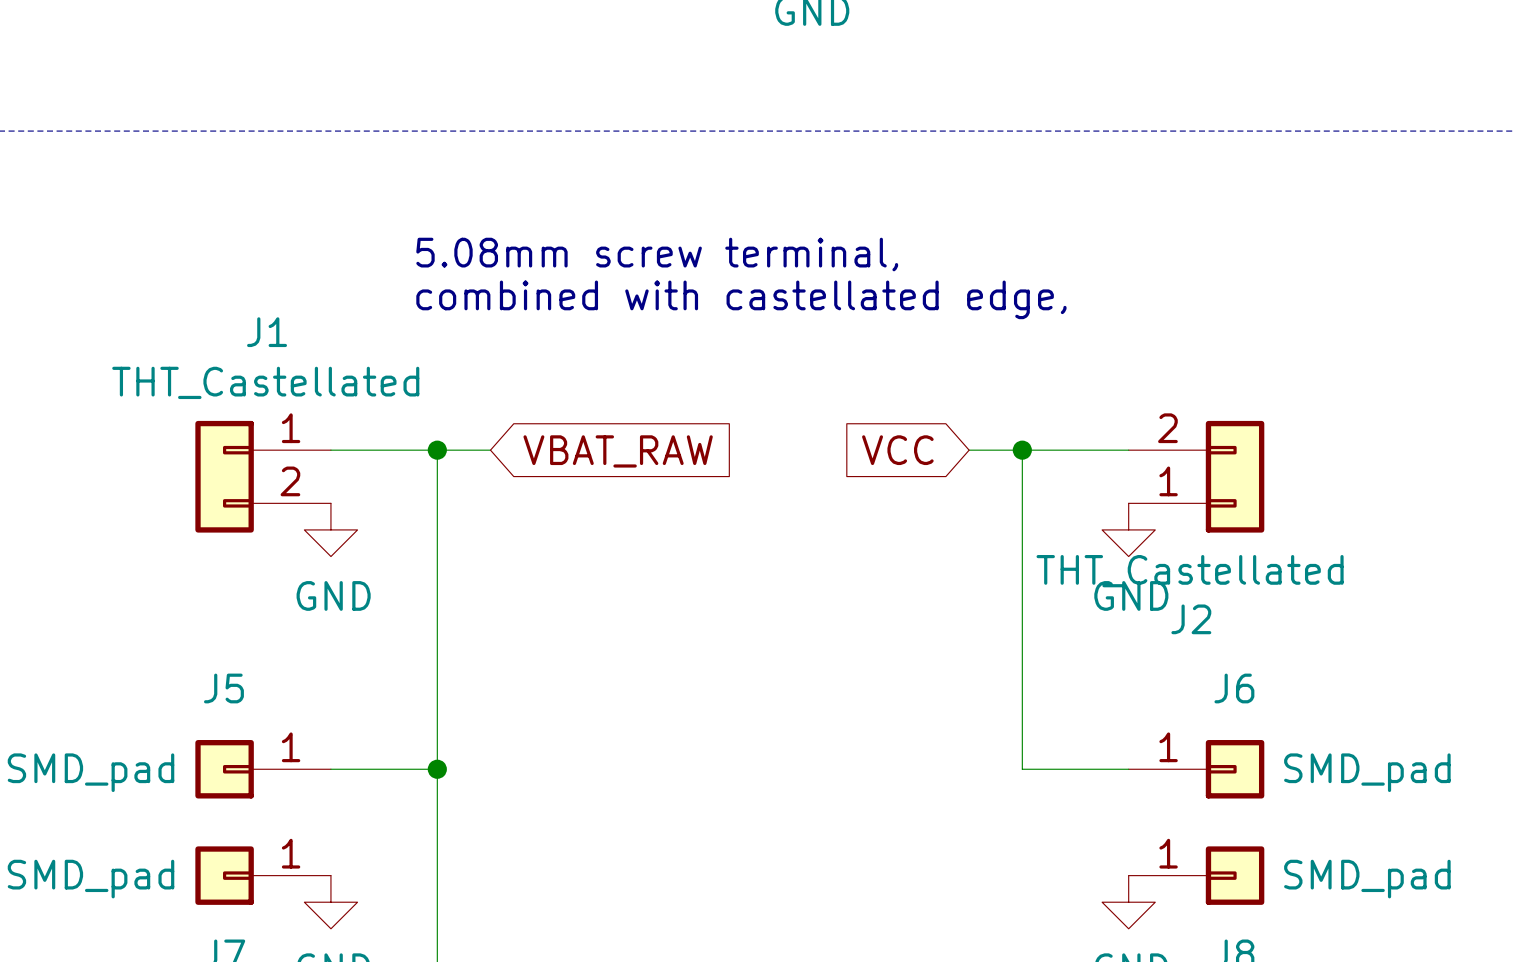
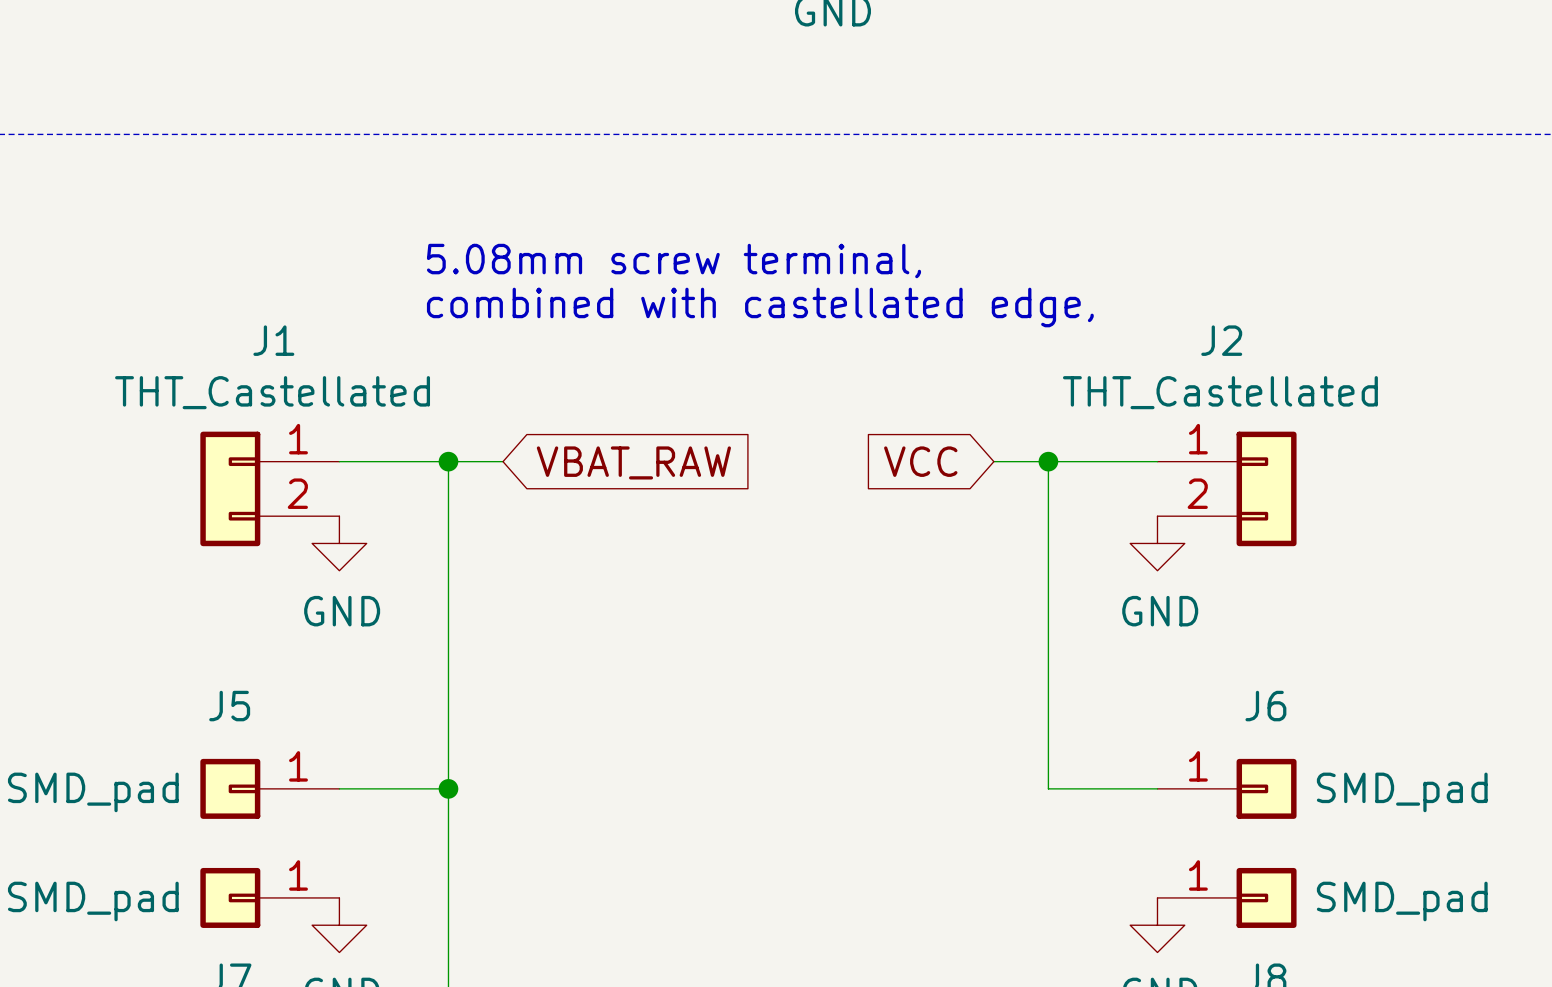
J2 flip: as is (1235, 476) -> up-down (1266, 488)

